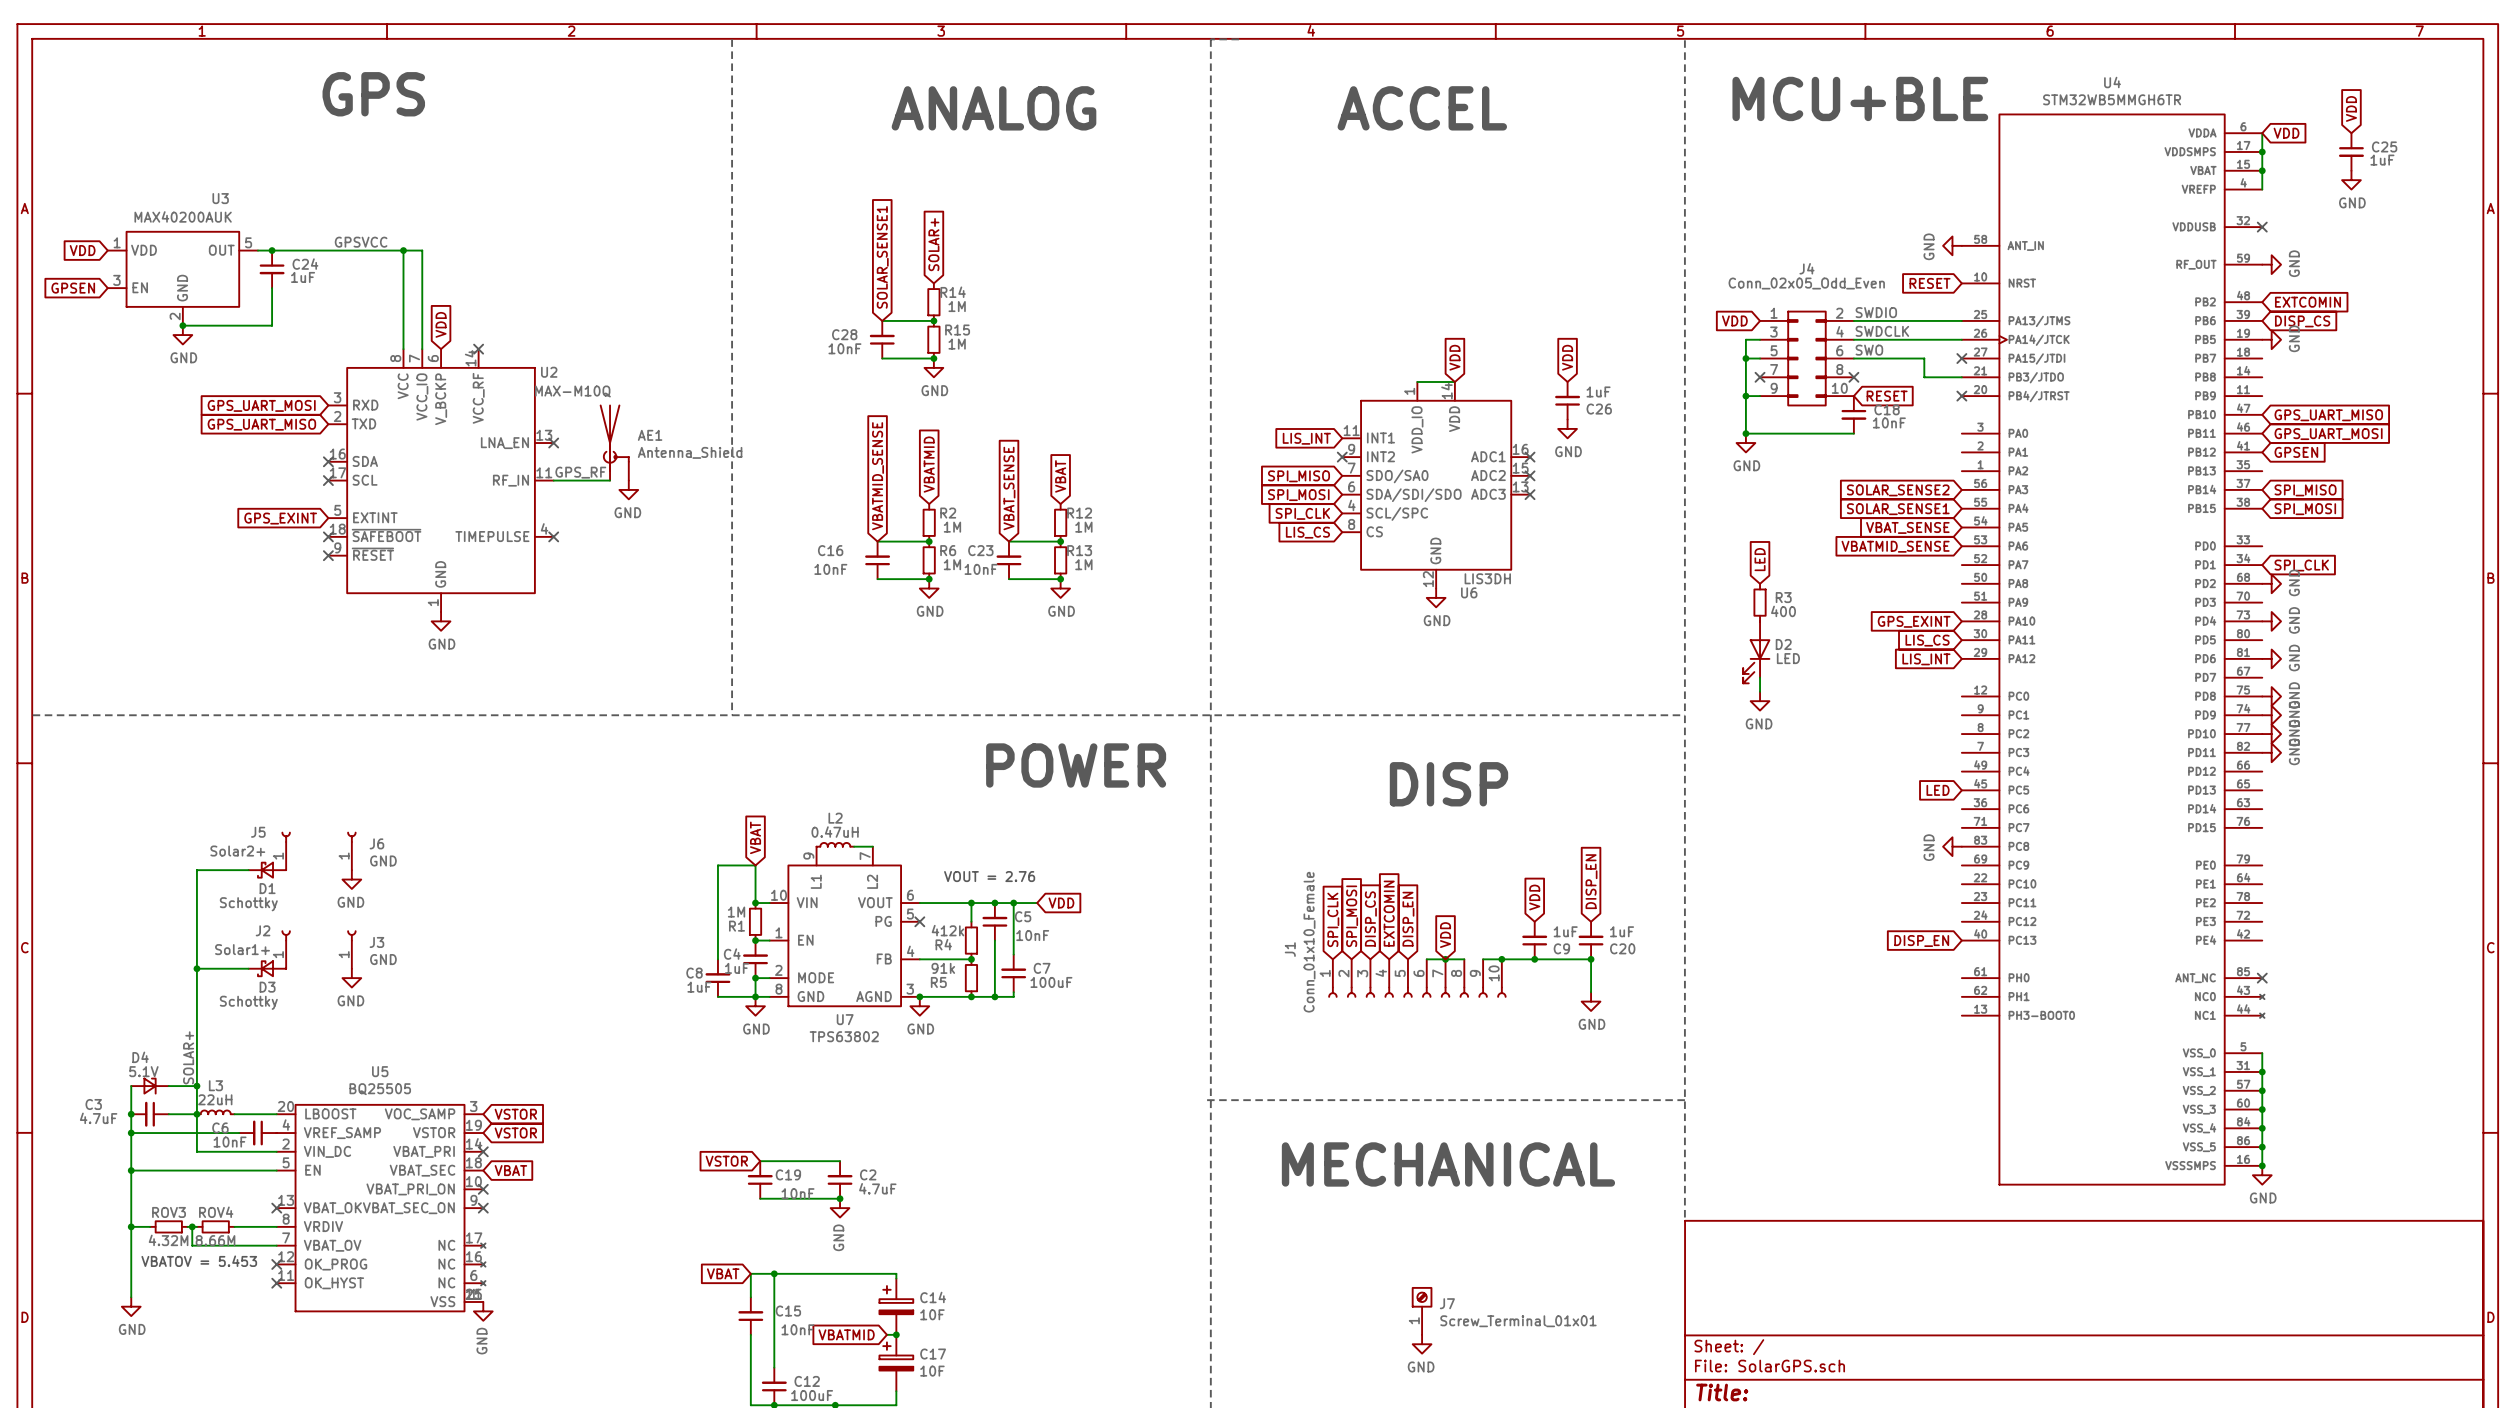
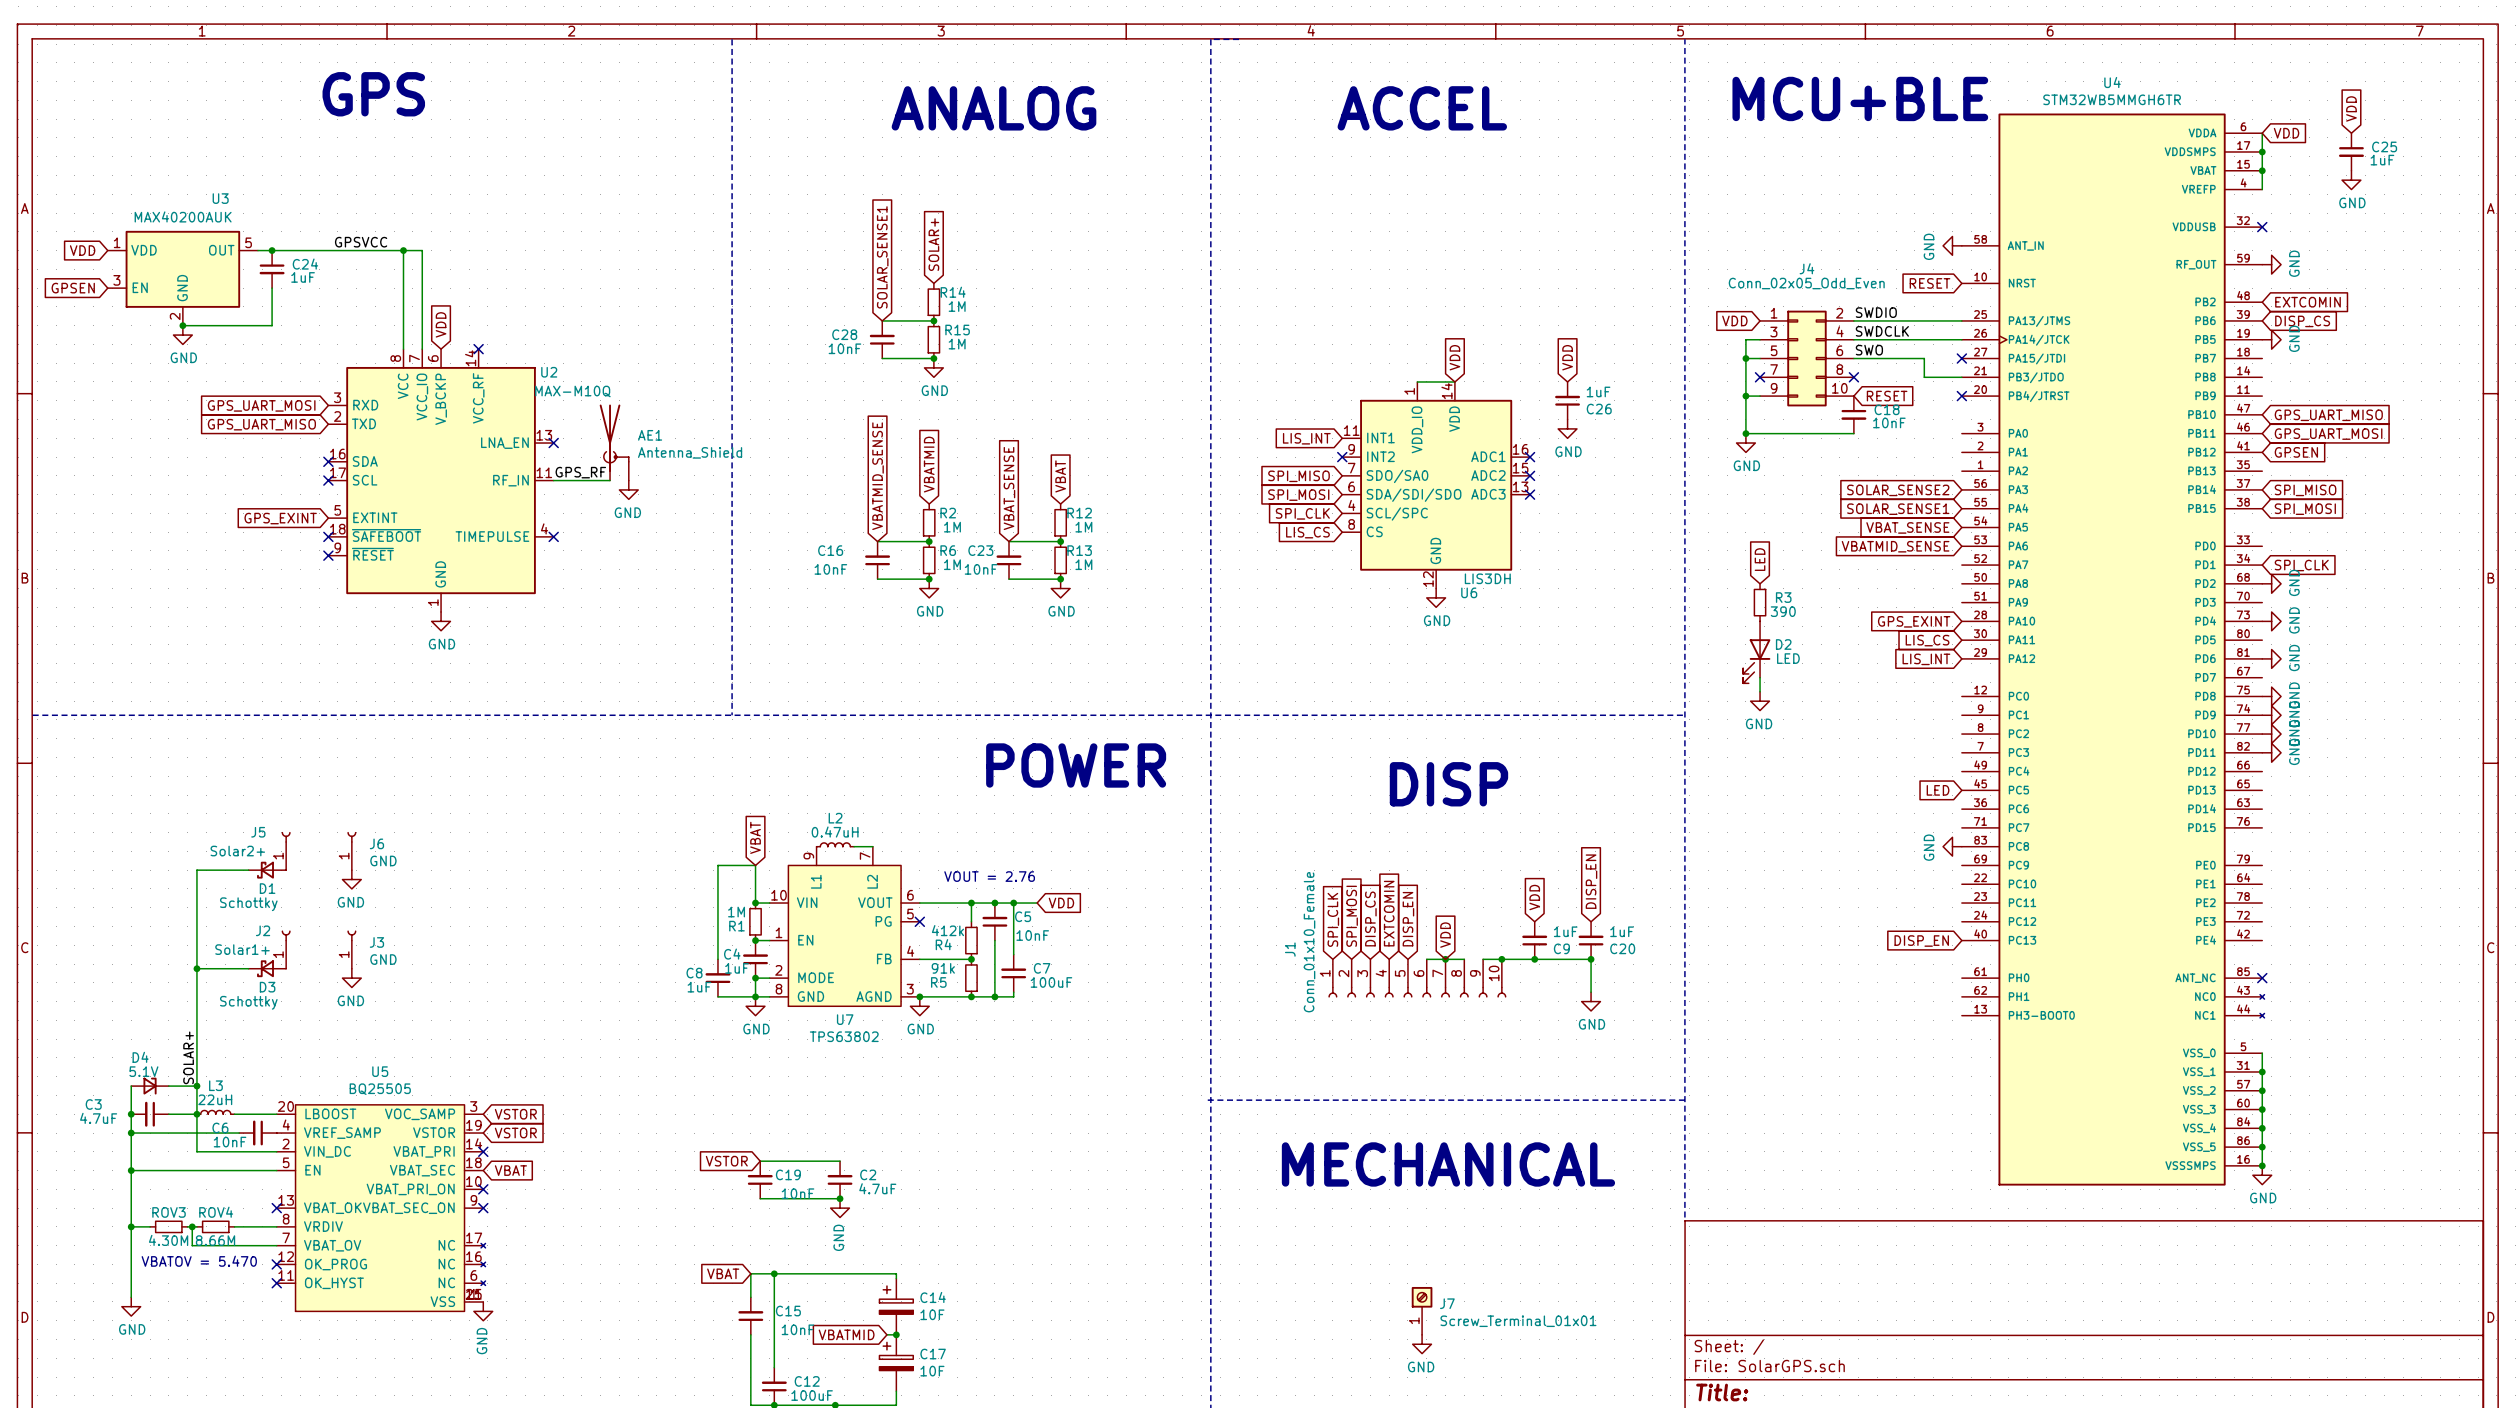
R3 value: 400 (1783, 611) -> 390 (1783, 611)
ROV3 value: 4.32M (168, 1240) -> 4.30M (168, 1240)
text: VBATOV = 5.453 (199, 1261) -> VBATOV = 5.470 (199, 1261)

